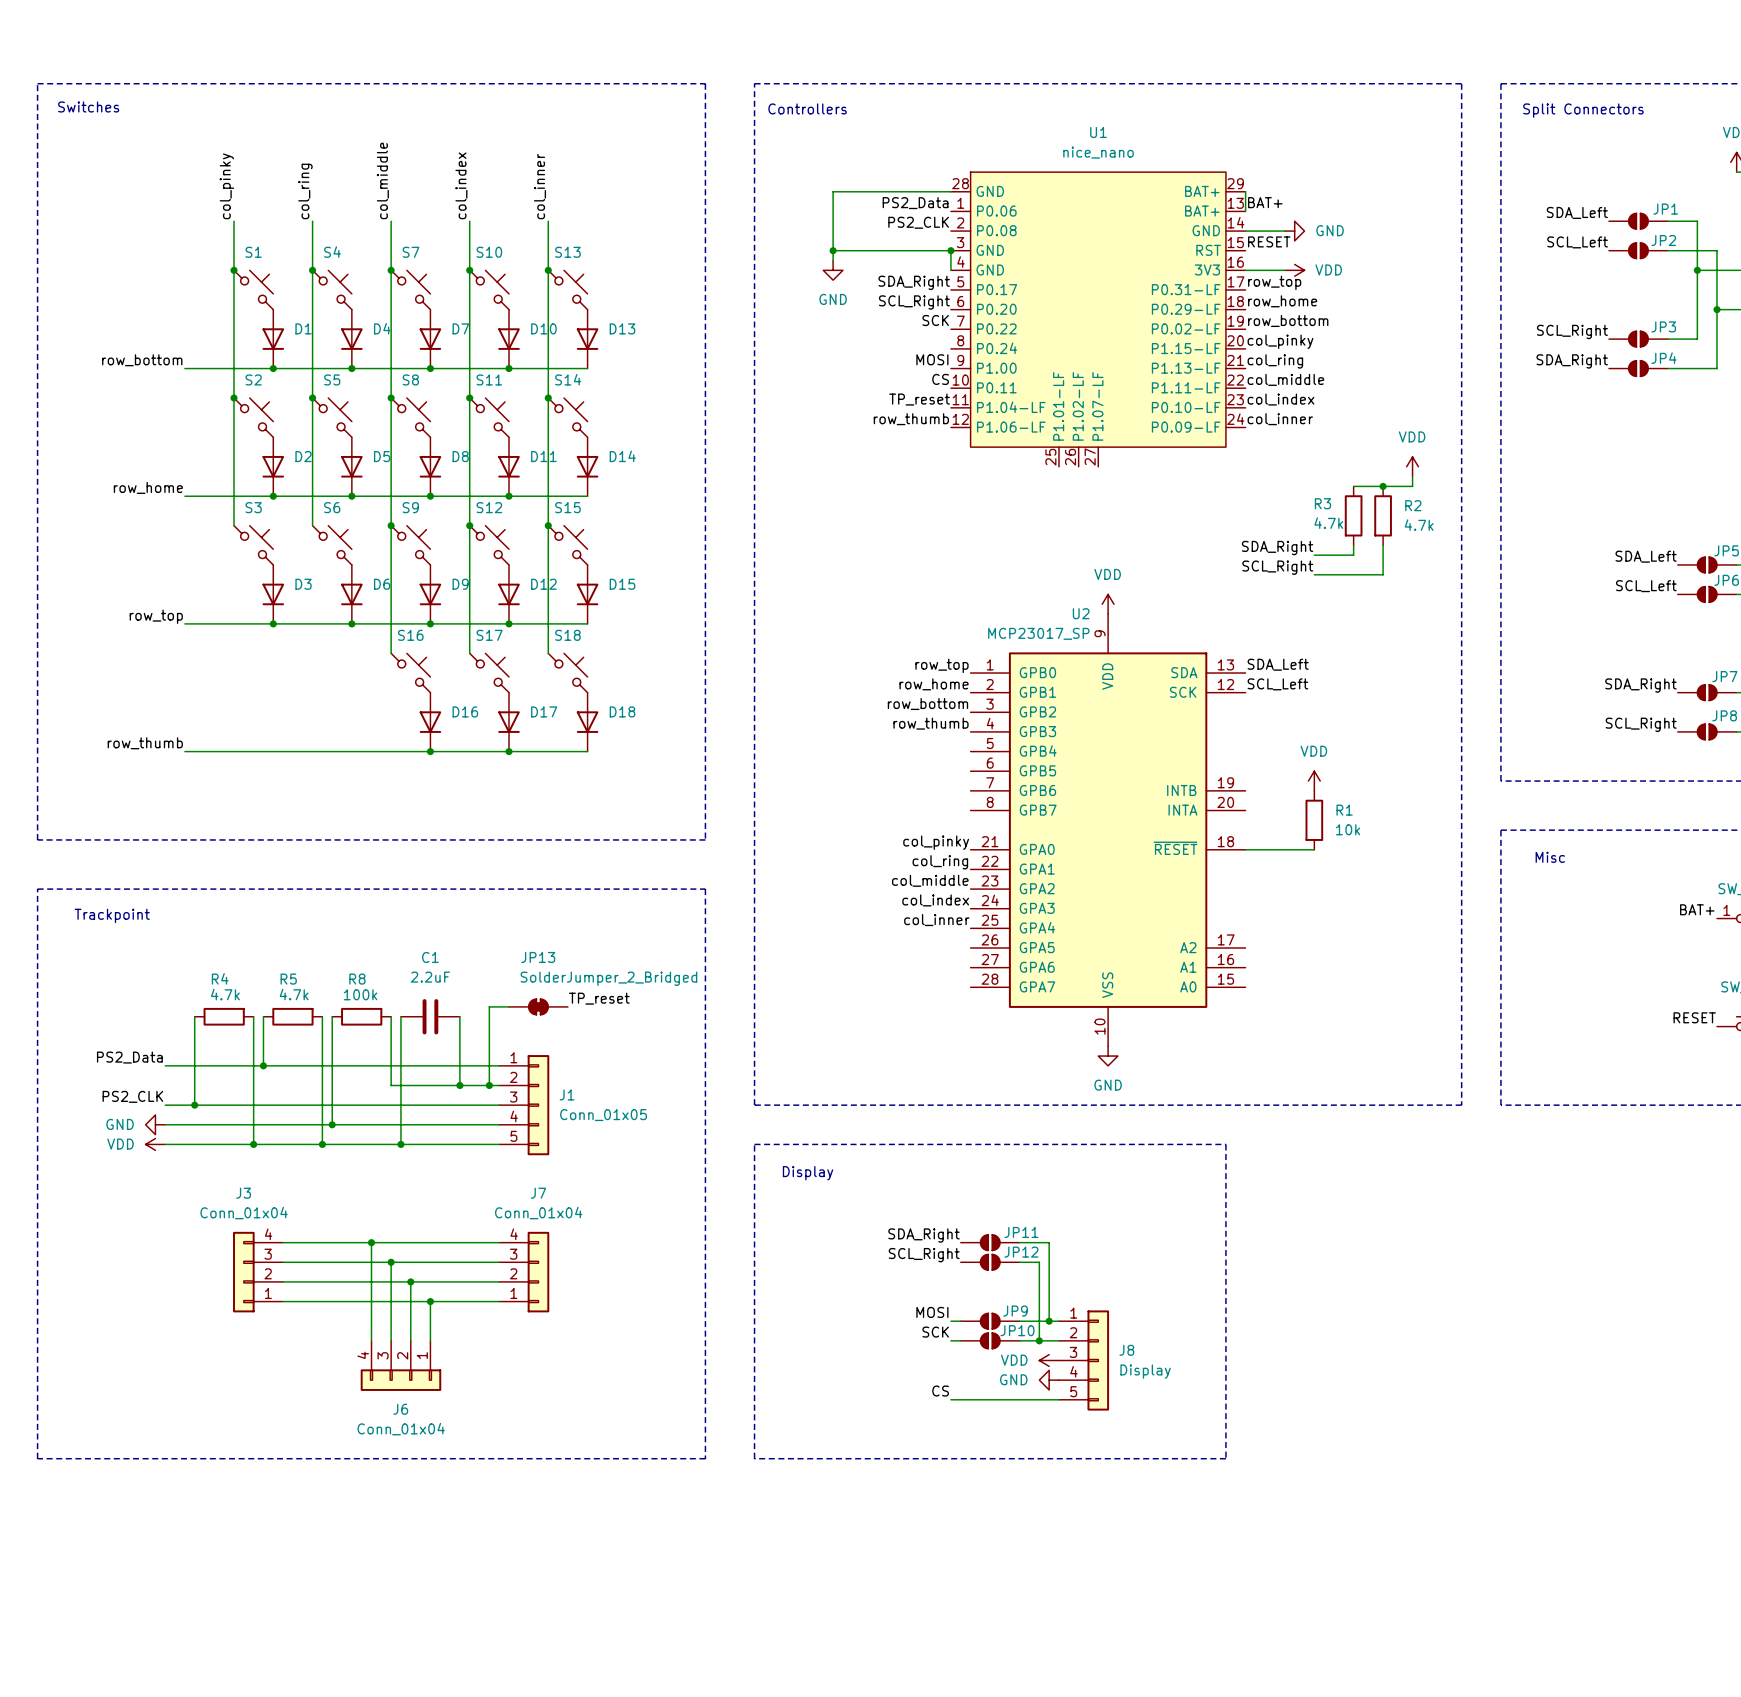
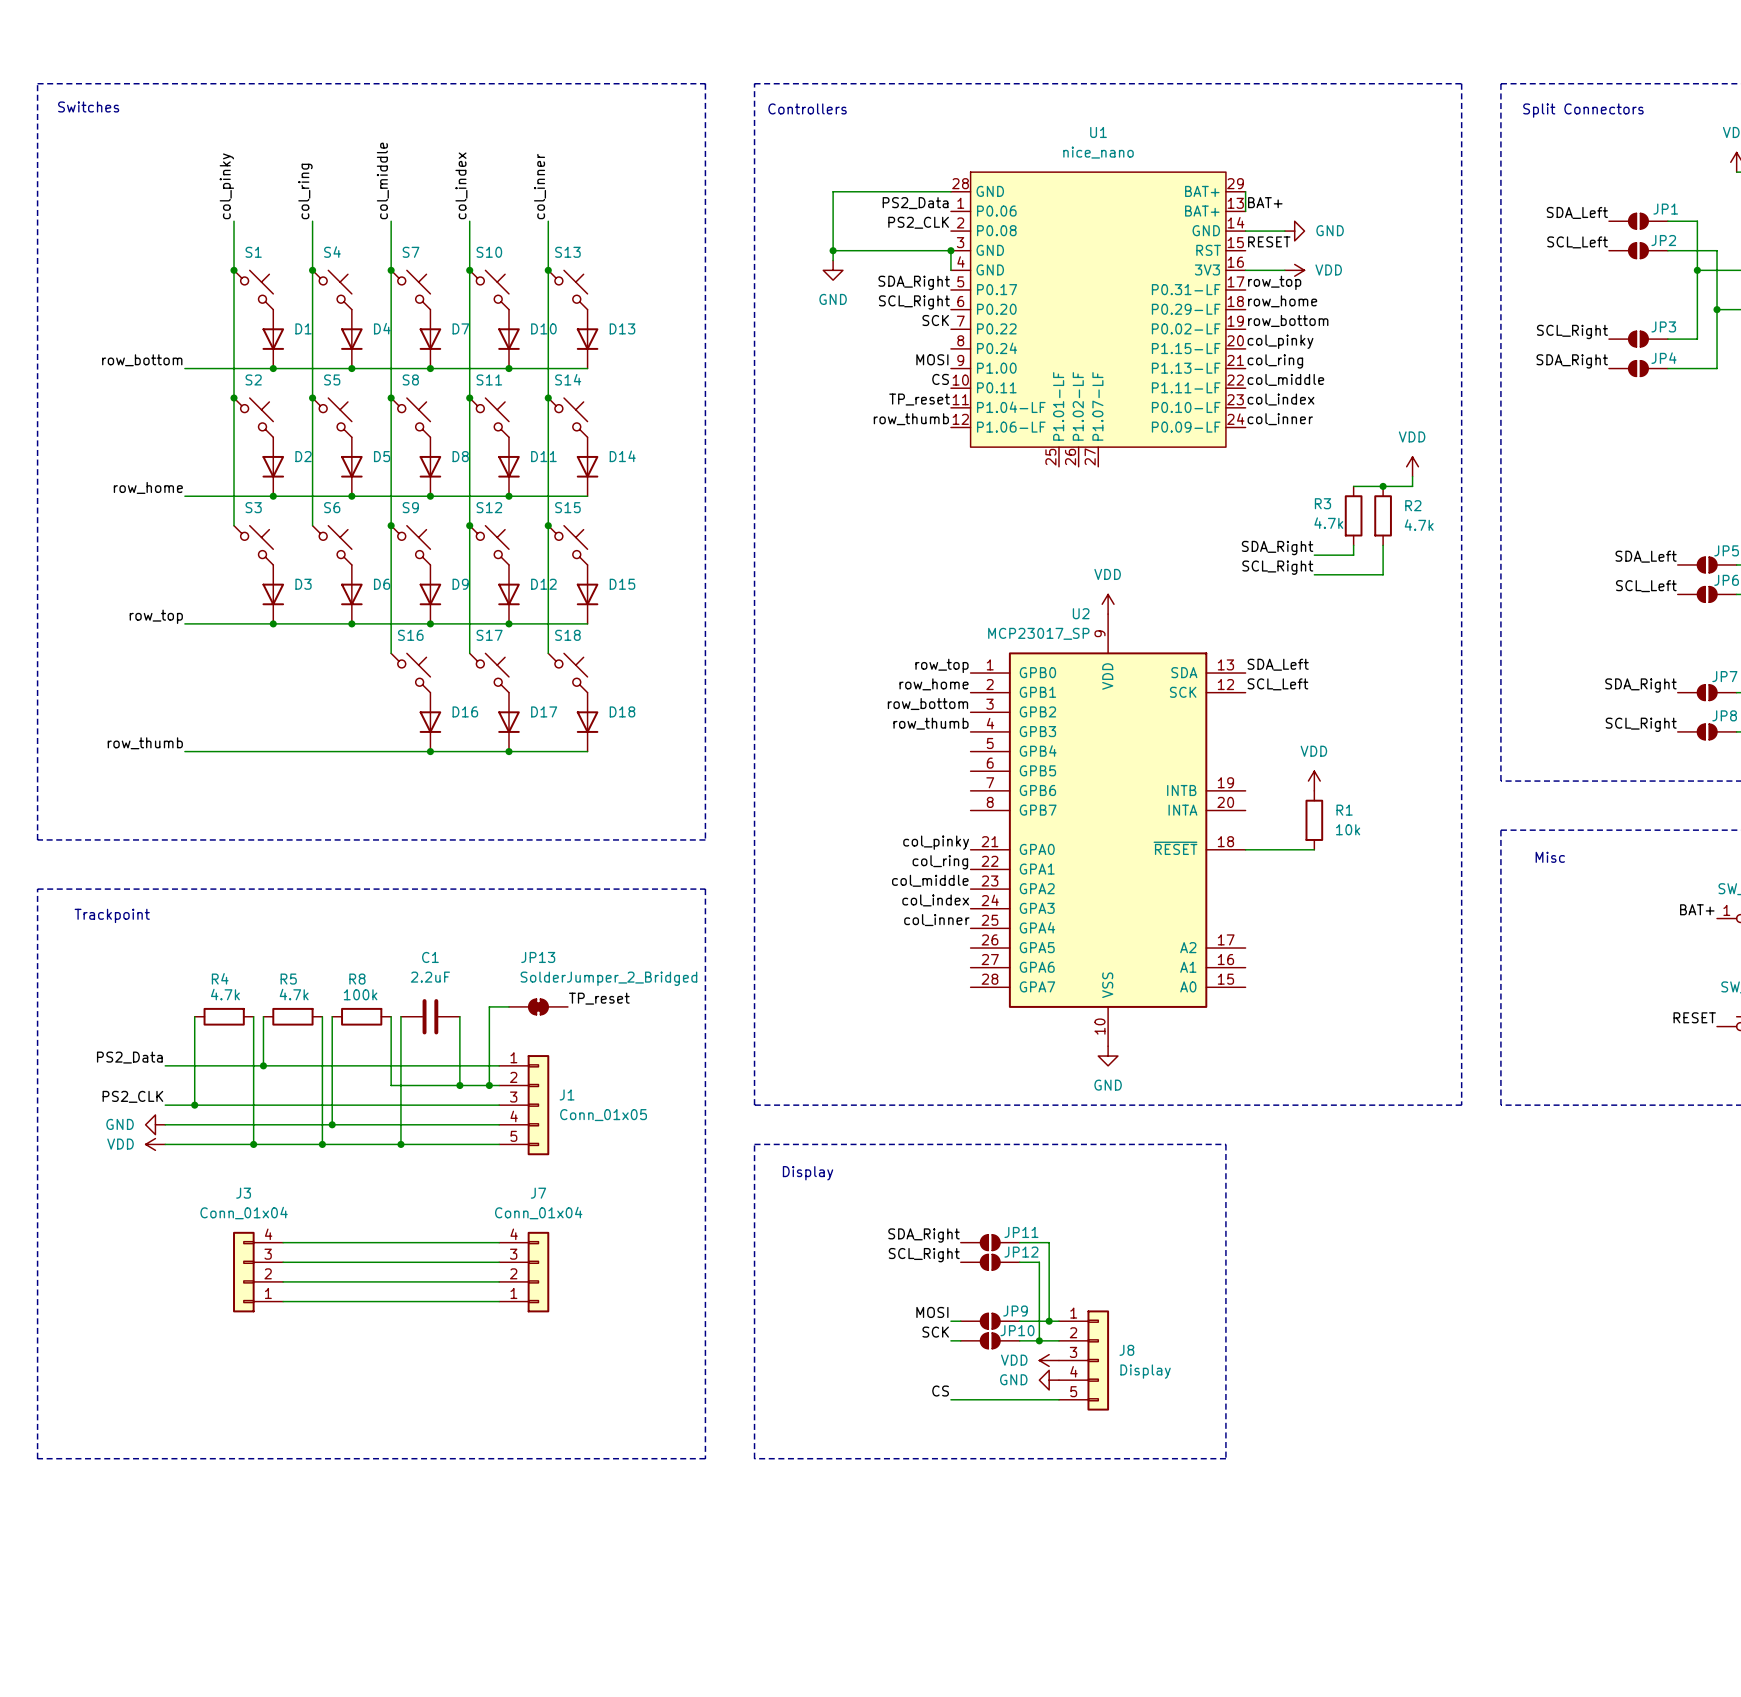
wire: (371, 1242) (371, 1340) -> none
junction: (371, 1242) -> none
wire: (391, 1262) (391, 1340) -> none
junction: (391, 1262) -> none
wire: (410, 1281) (410, 1340) -> none
junction: (410, 1281) -> none
wire: (430, 1301) (430, 1340) -> none
junction: (430, 1301) -> none
J6: Conn_01x04 (400, 1365) -> none

